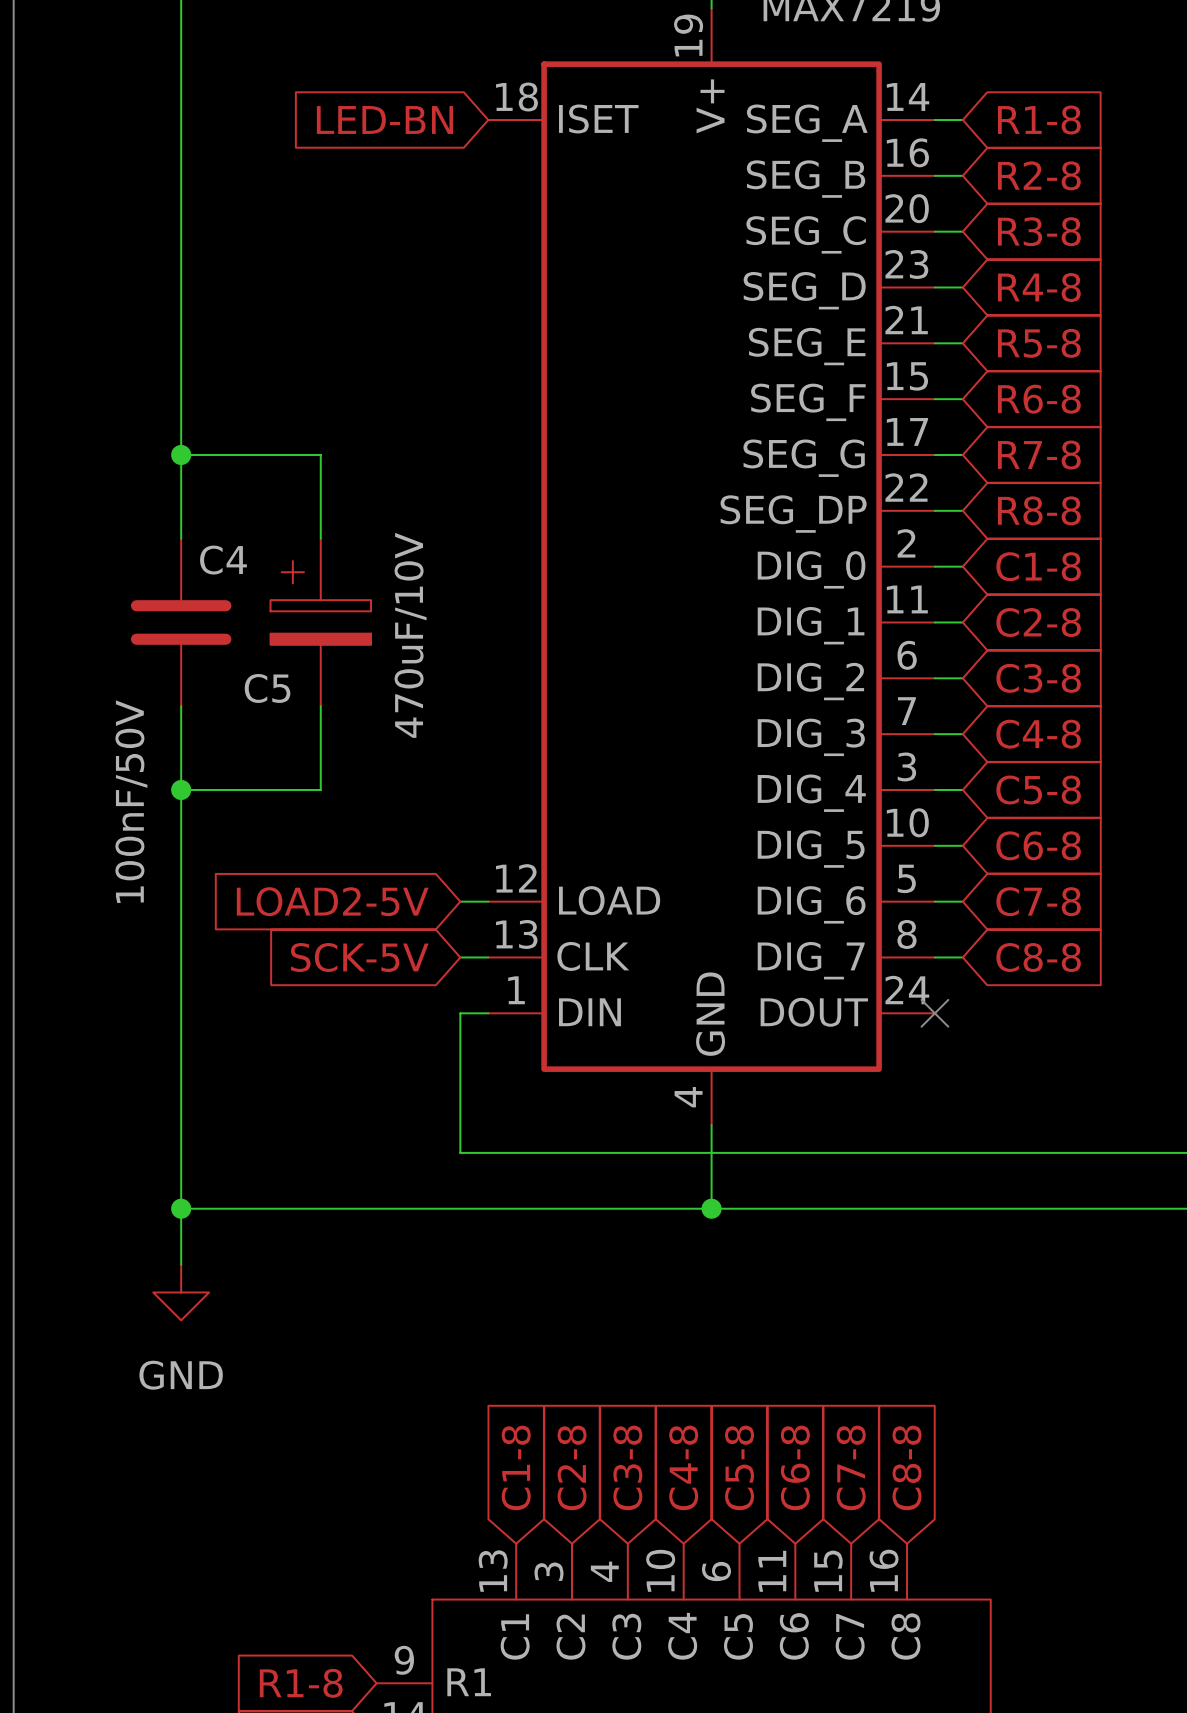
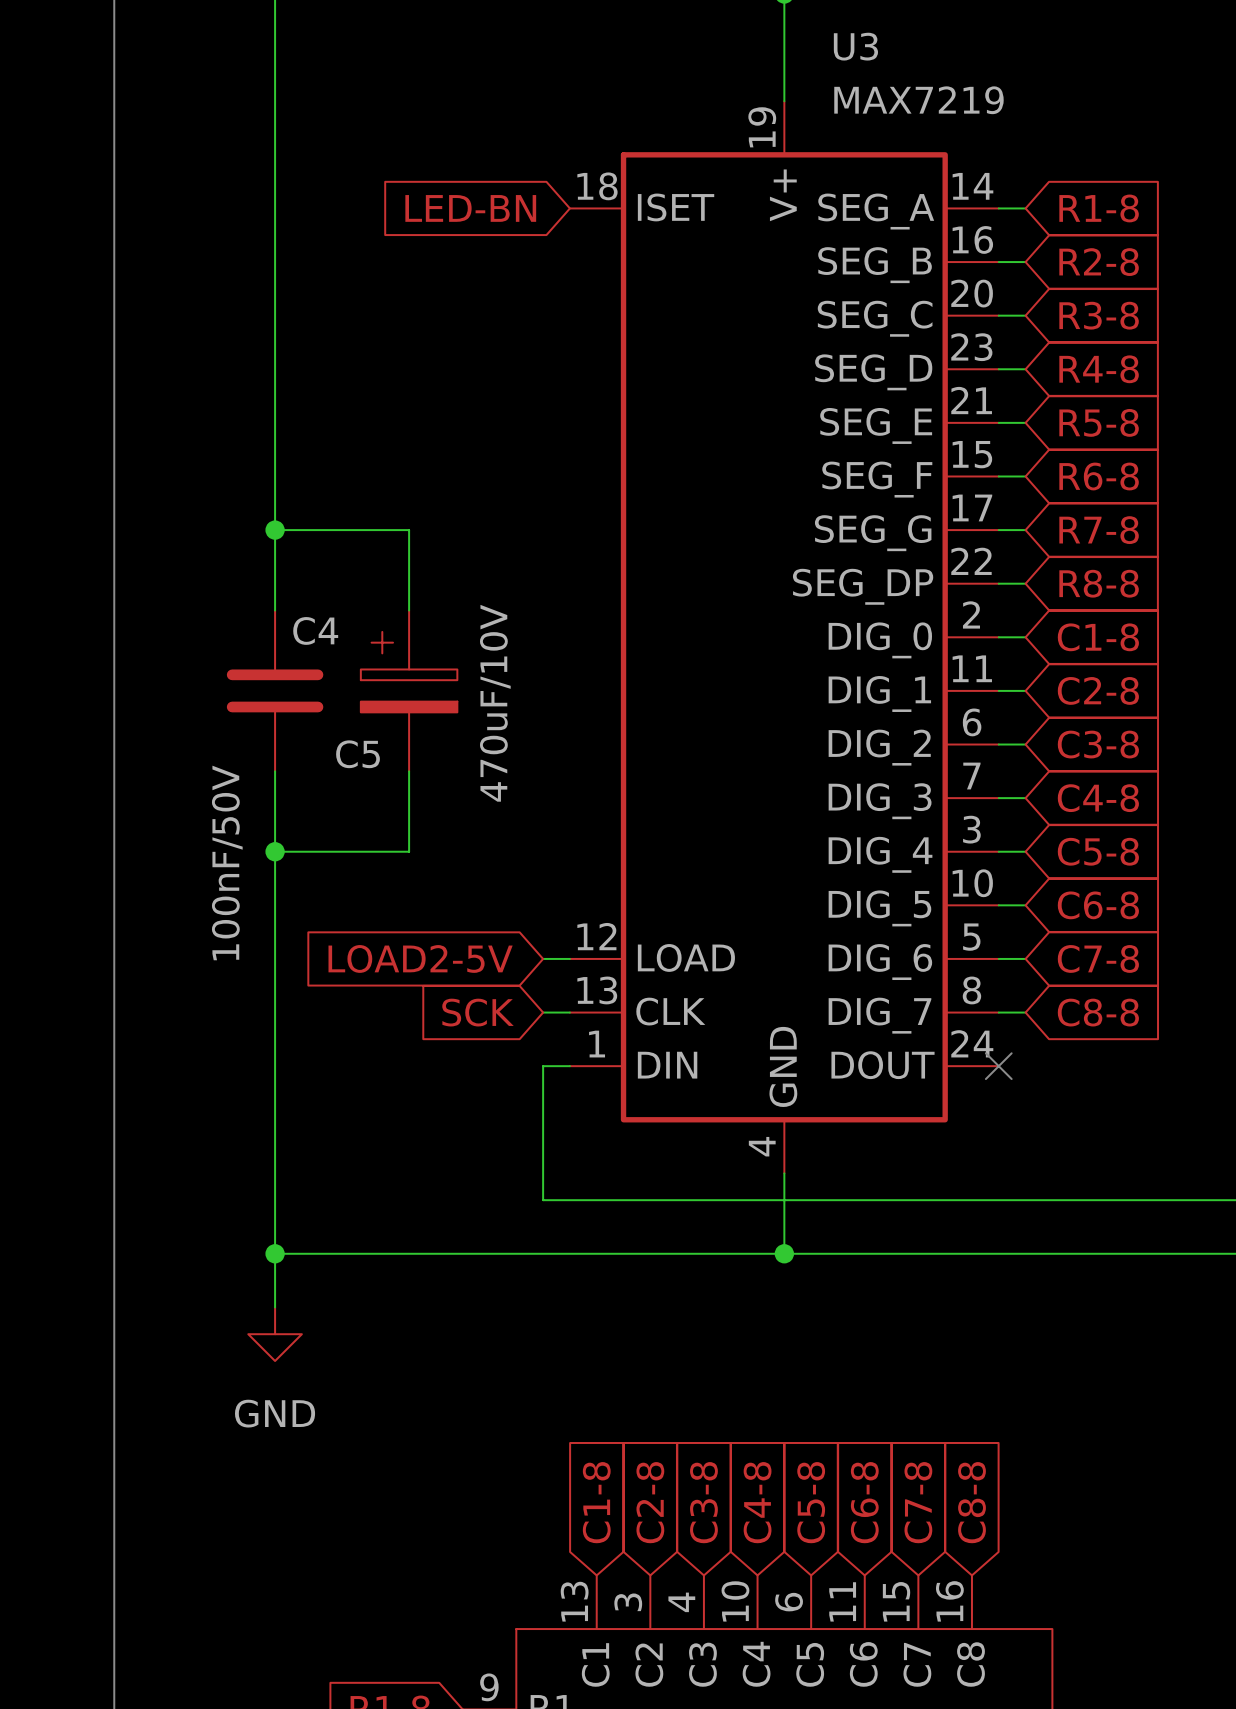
global label: SCK-5V (359, 957) -> SCK (478, 1012)

